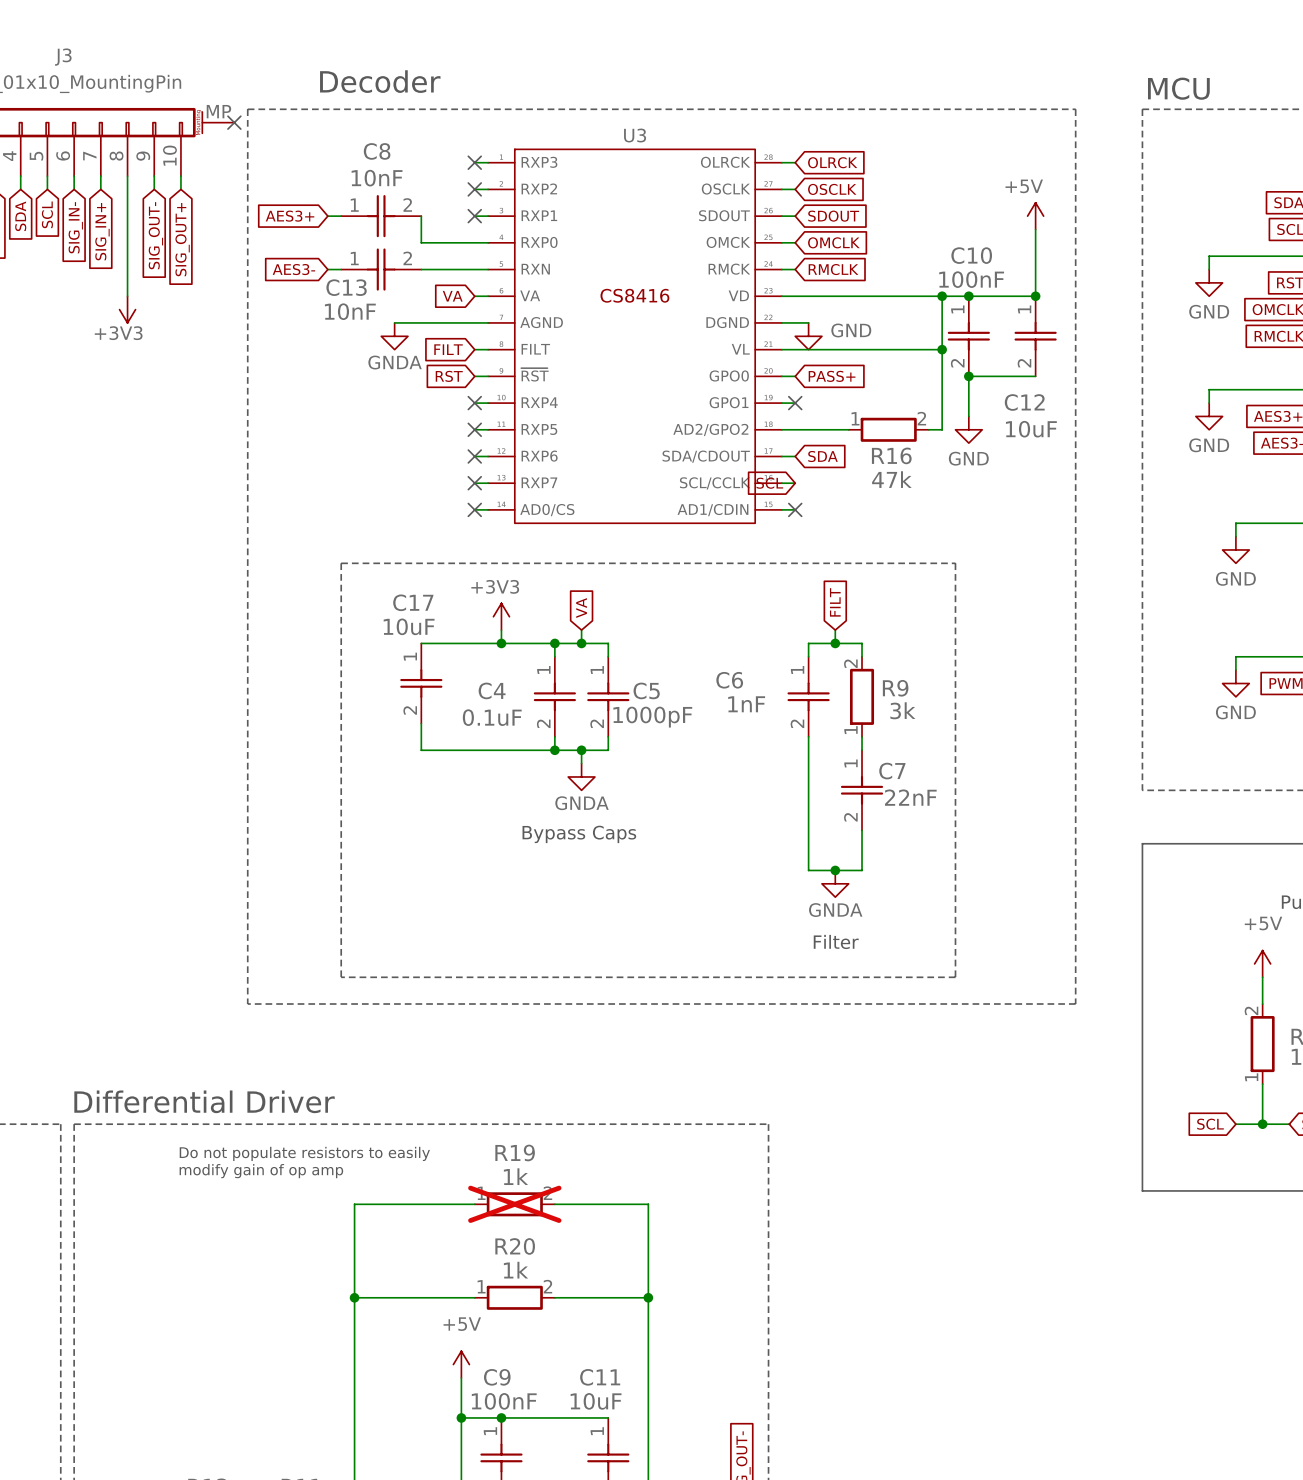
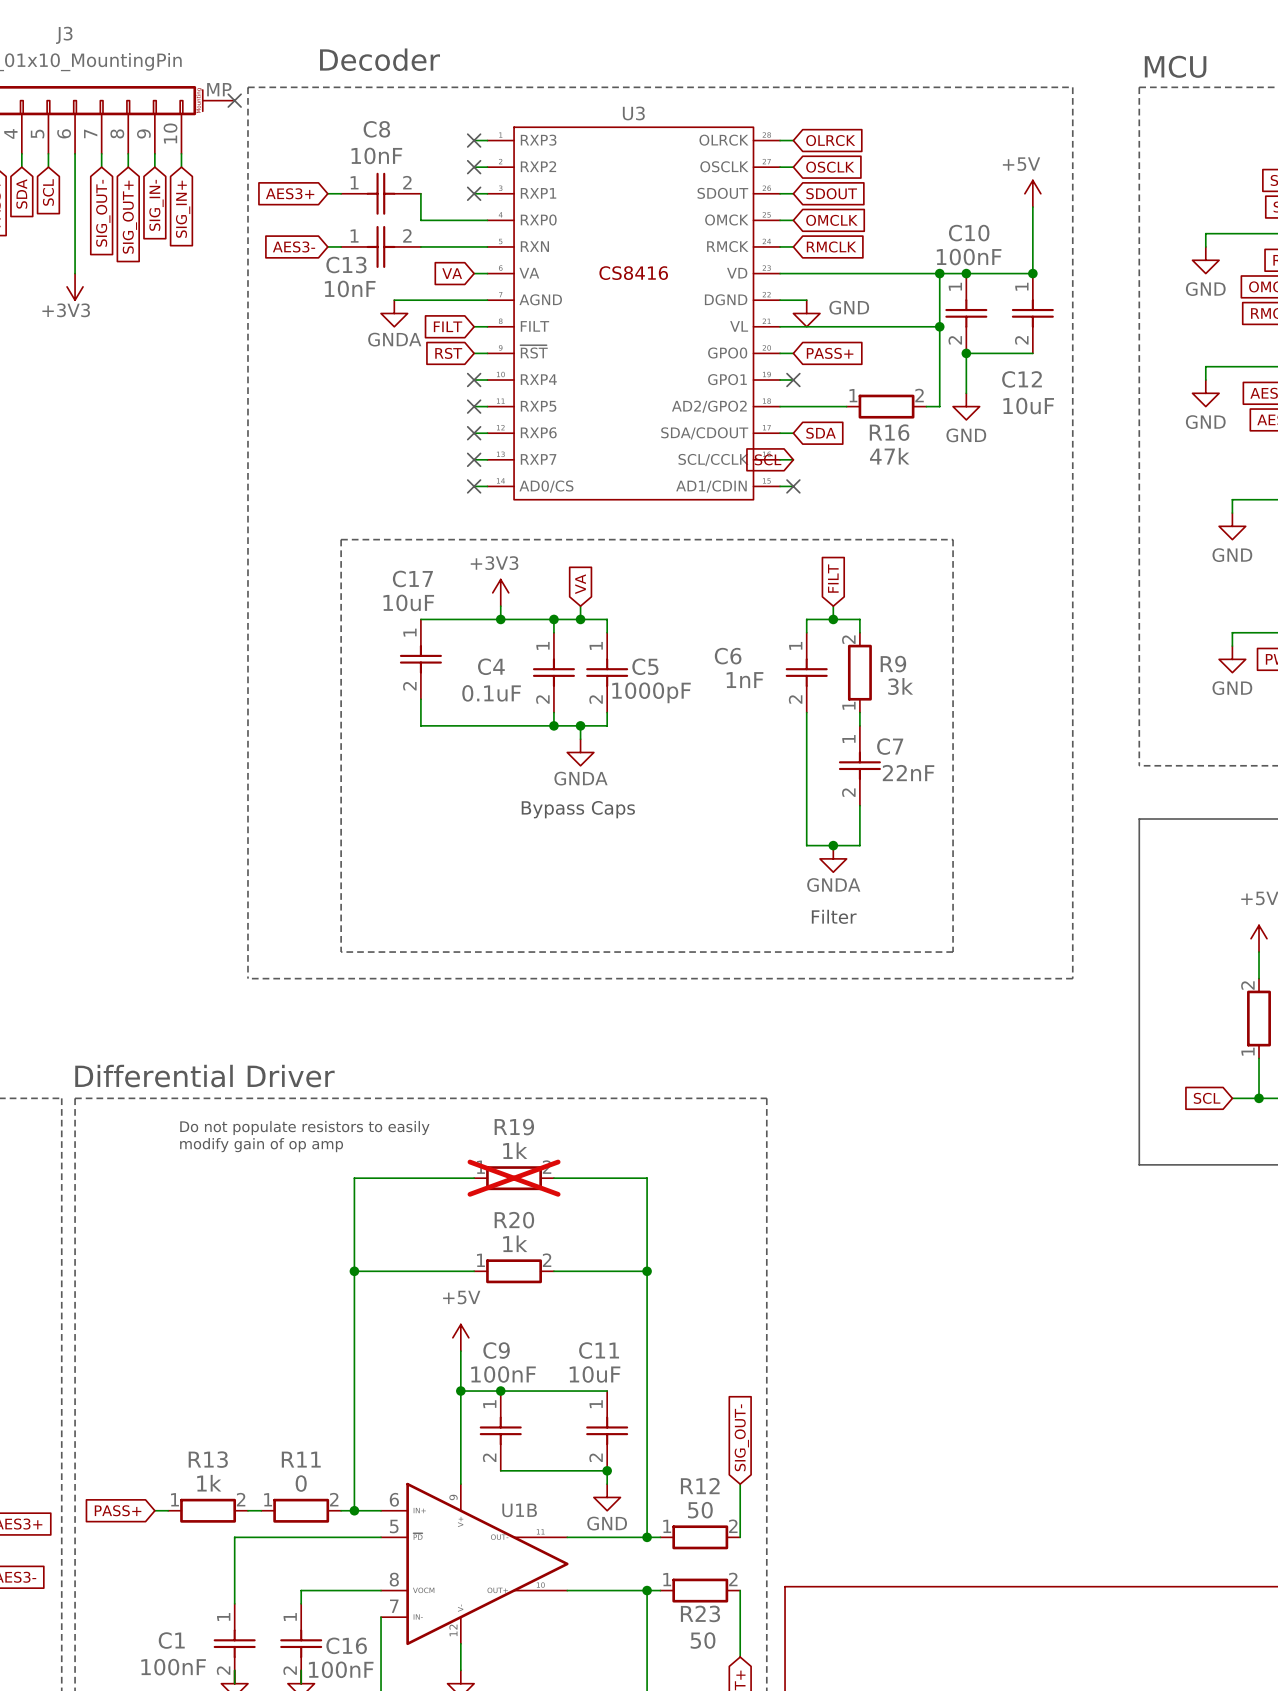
wire: (127, 189) (127, 296) -> (75, 167) (75, 273)
global label: SIG_IN- (75, 227) -> none
global label: SIG_IN+ (102, 231) -> SIG_OUT- (103, 213)
global label: SIG_OUT- (155, 235) -> SIG_IN- (156, 205)
global label: none -> SIG_OUT+ (129, 217)
global label: SIG_OUT+ (182, 239) -> SIG_IN+ (183, 209)
power symbol position: +3V3 (127, 309) -> +3V3 (75, 286)

